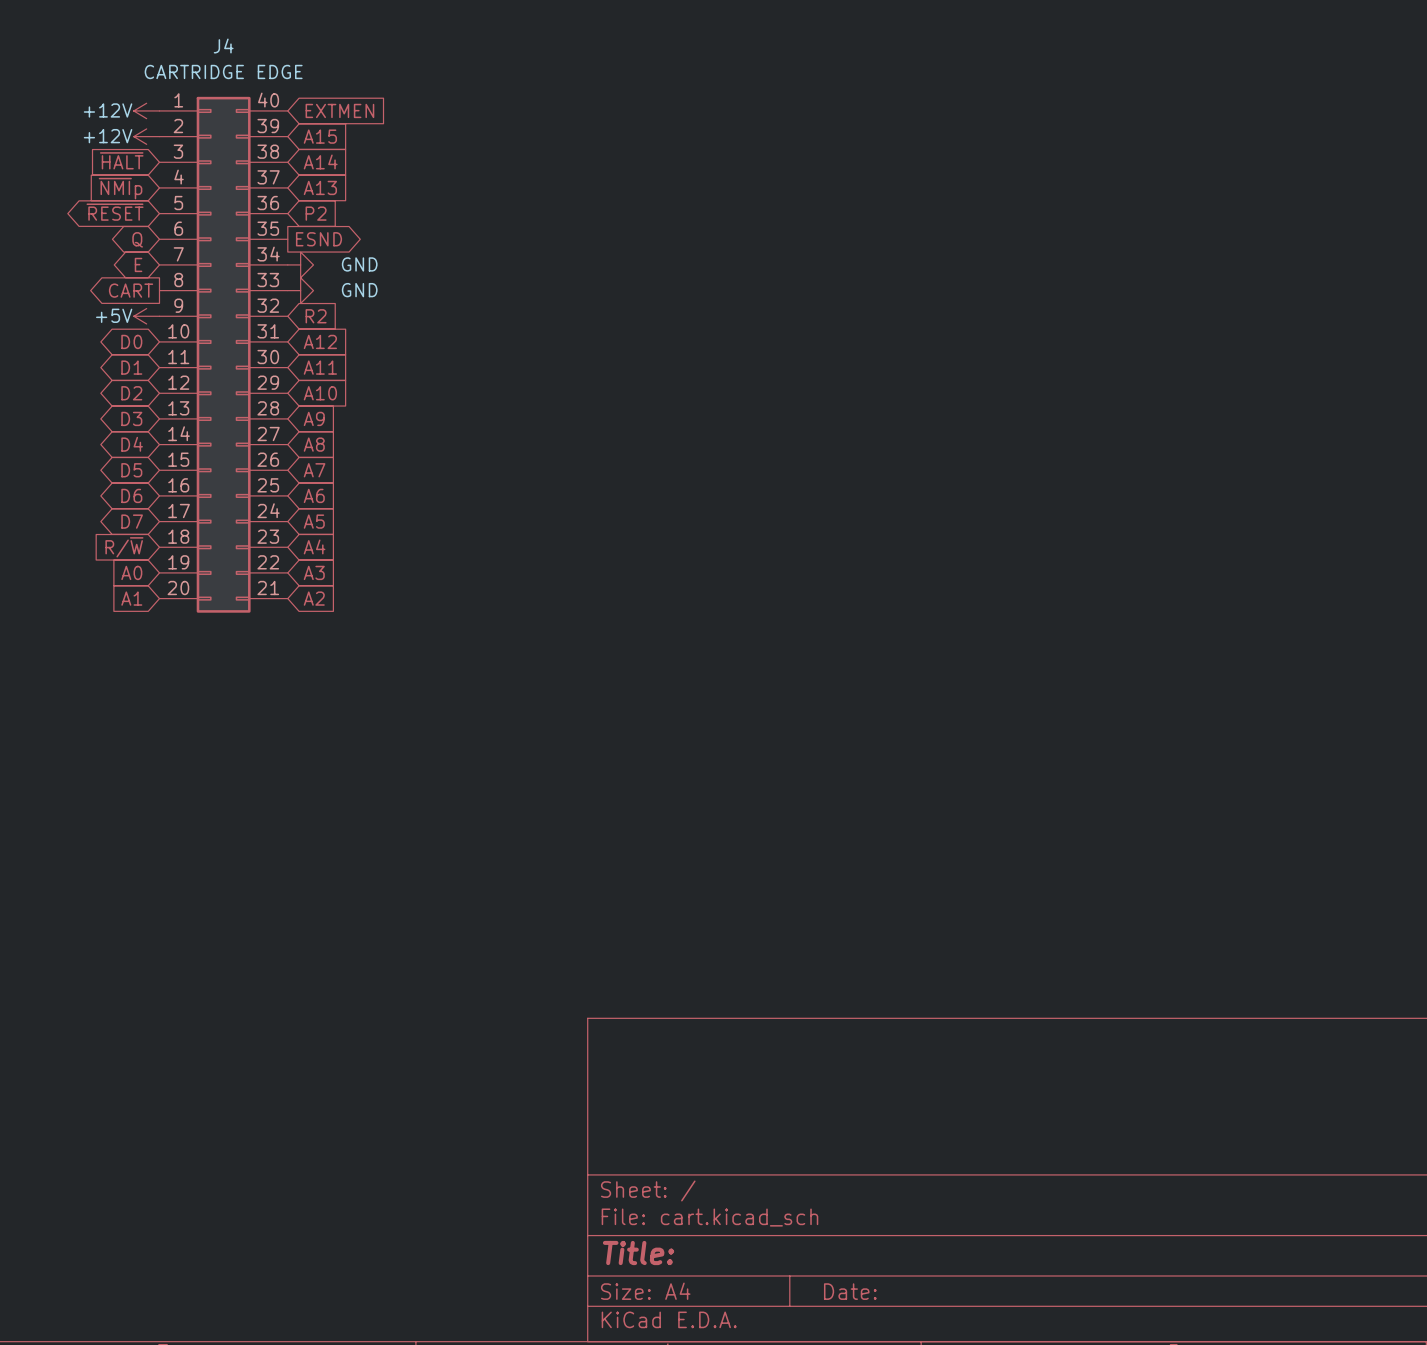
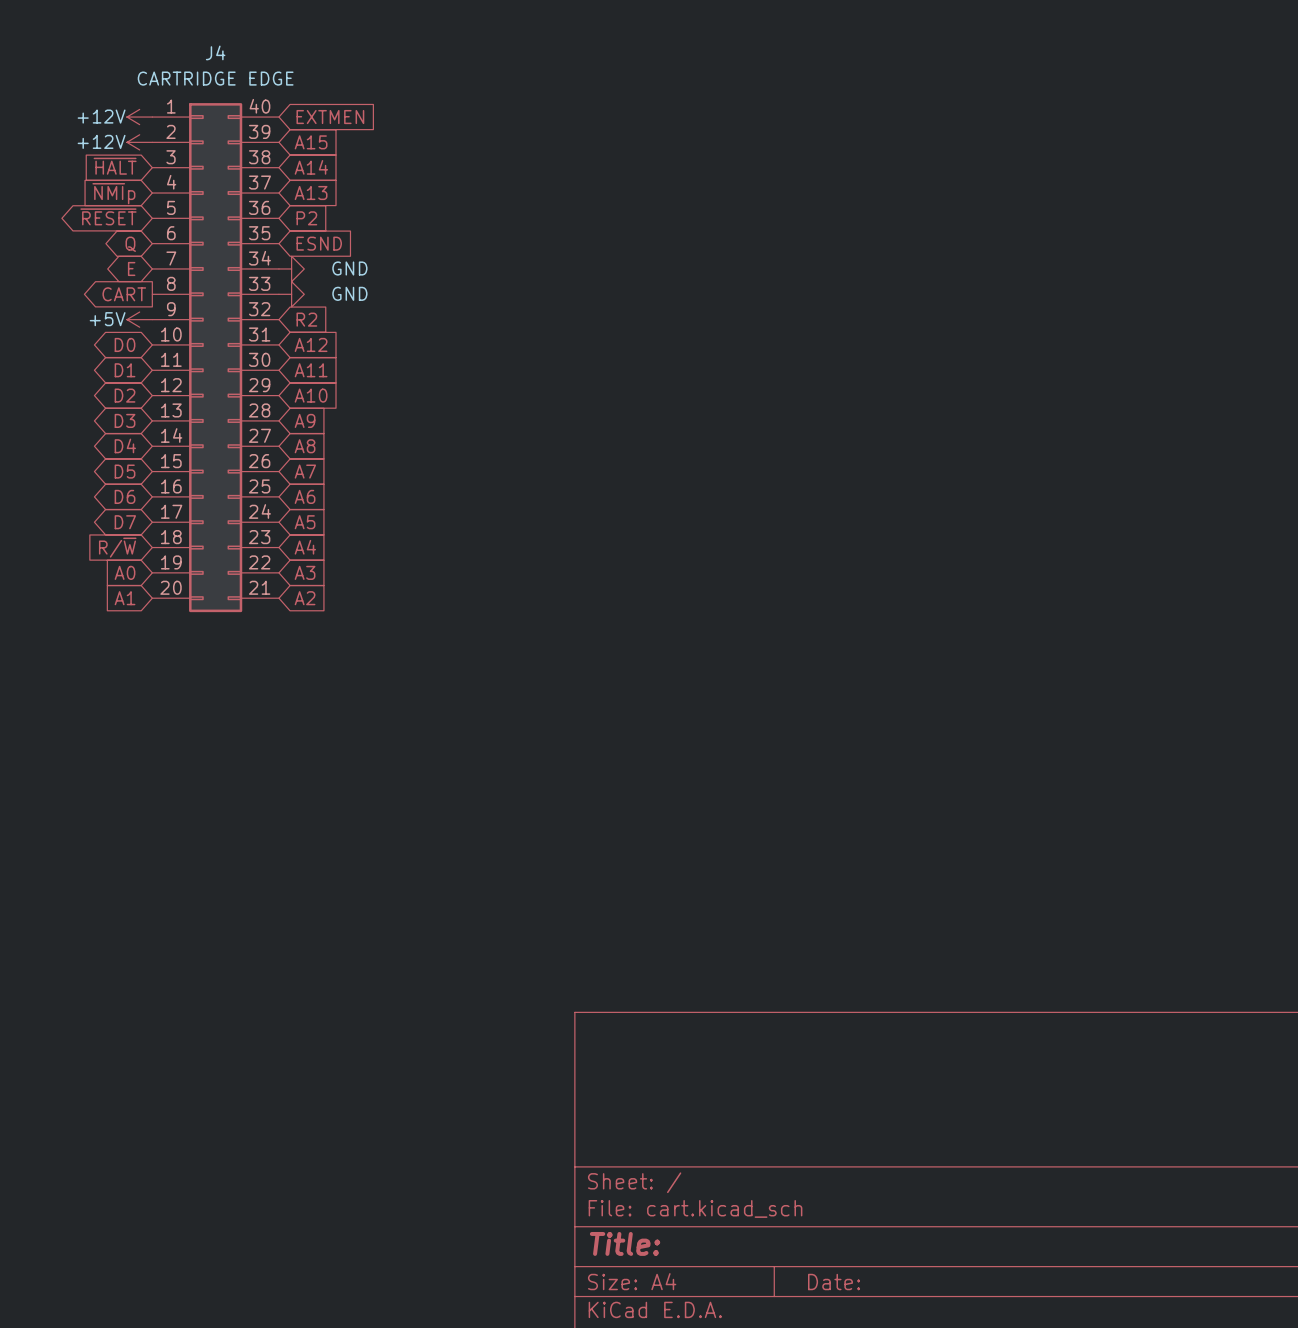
global label shape: output (318, 239) -> input (319, 243)

